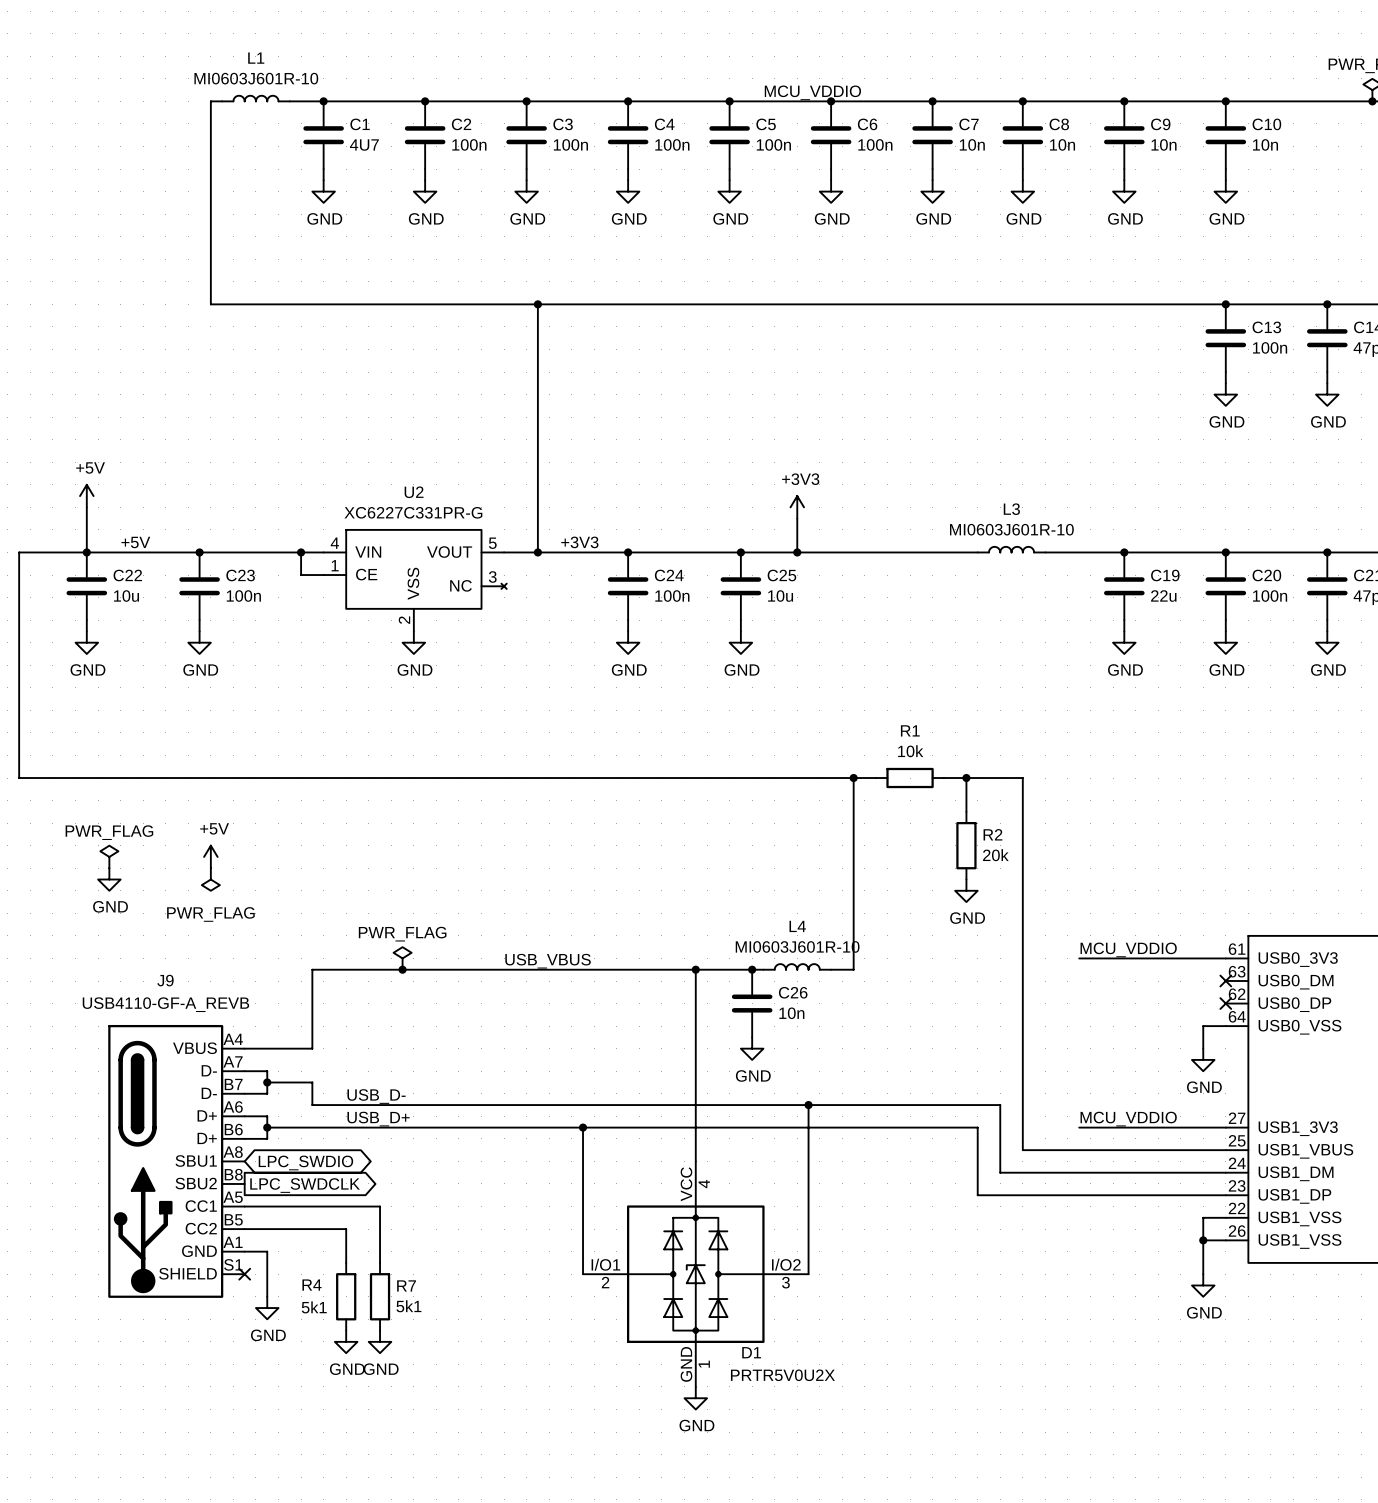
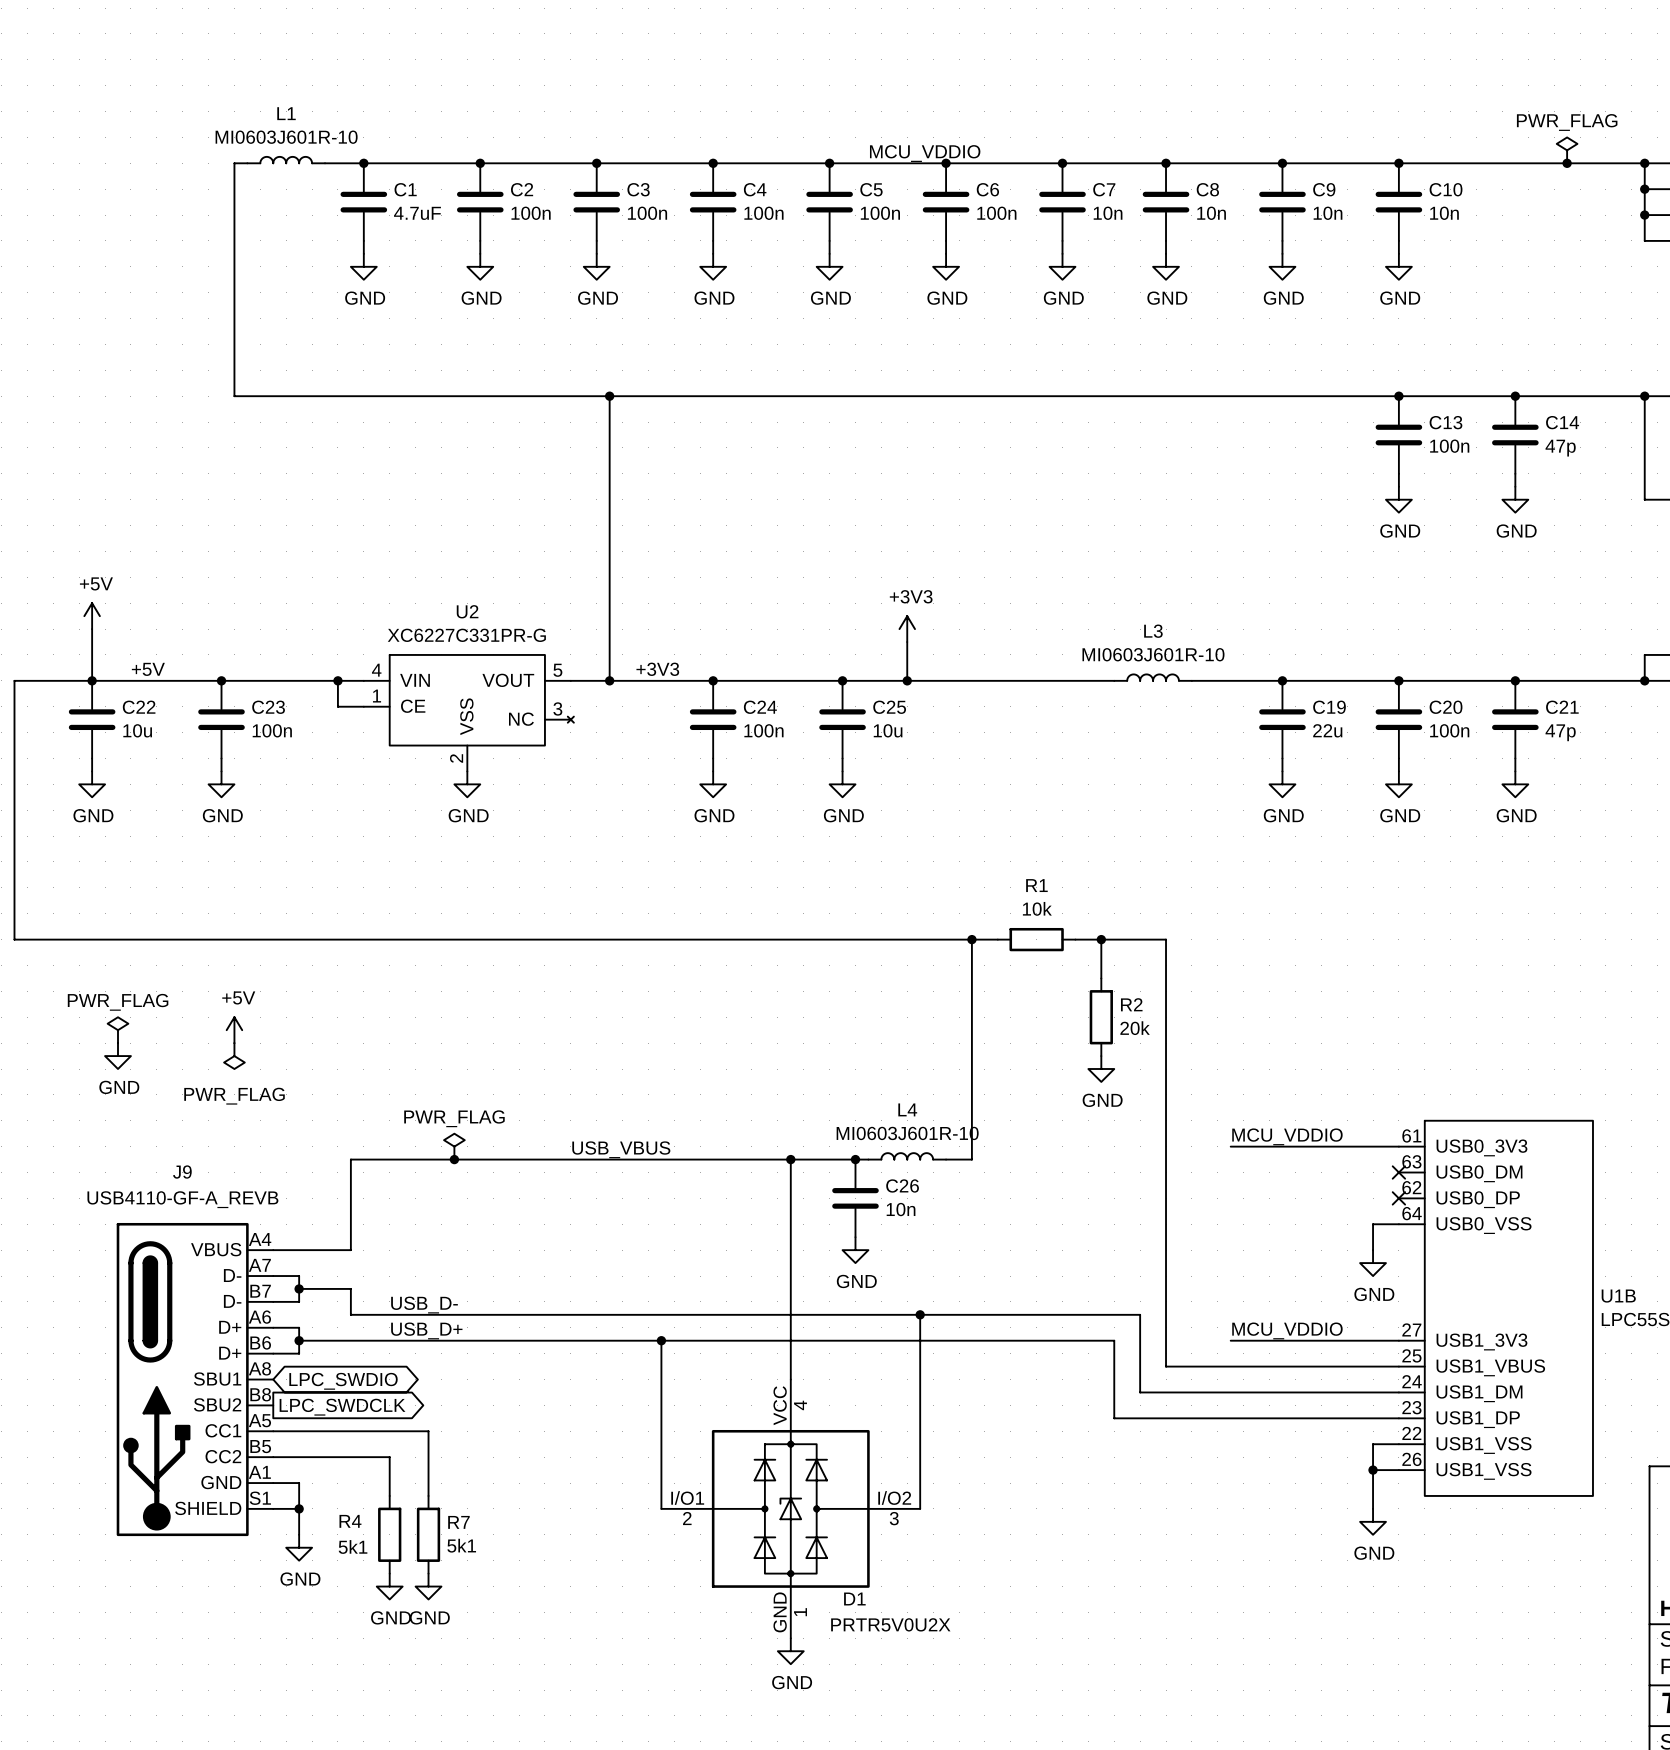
C1 value: 4U7 (364, 145) -> 4.7uF (417, 213)
wire: none -> (273, 1508) (299, 1508)
no-connect mark: (244, 1274) -> none
junction: none -> (299, 1508)

